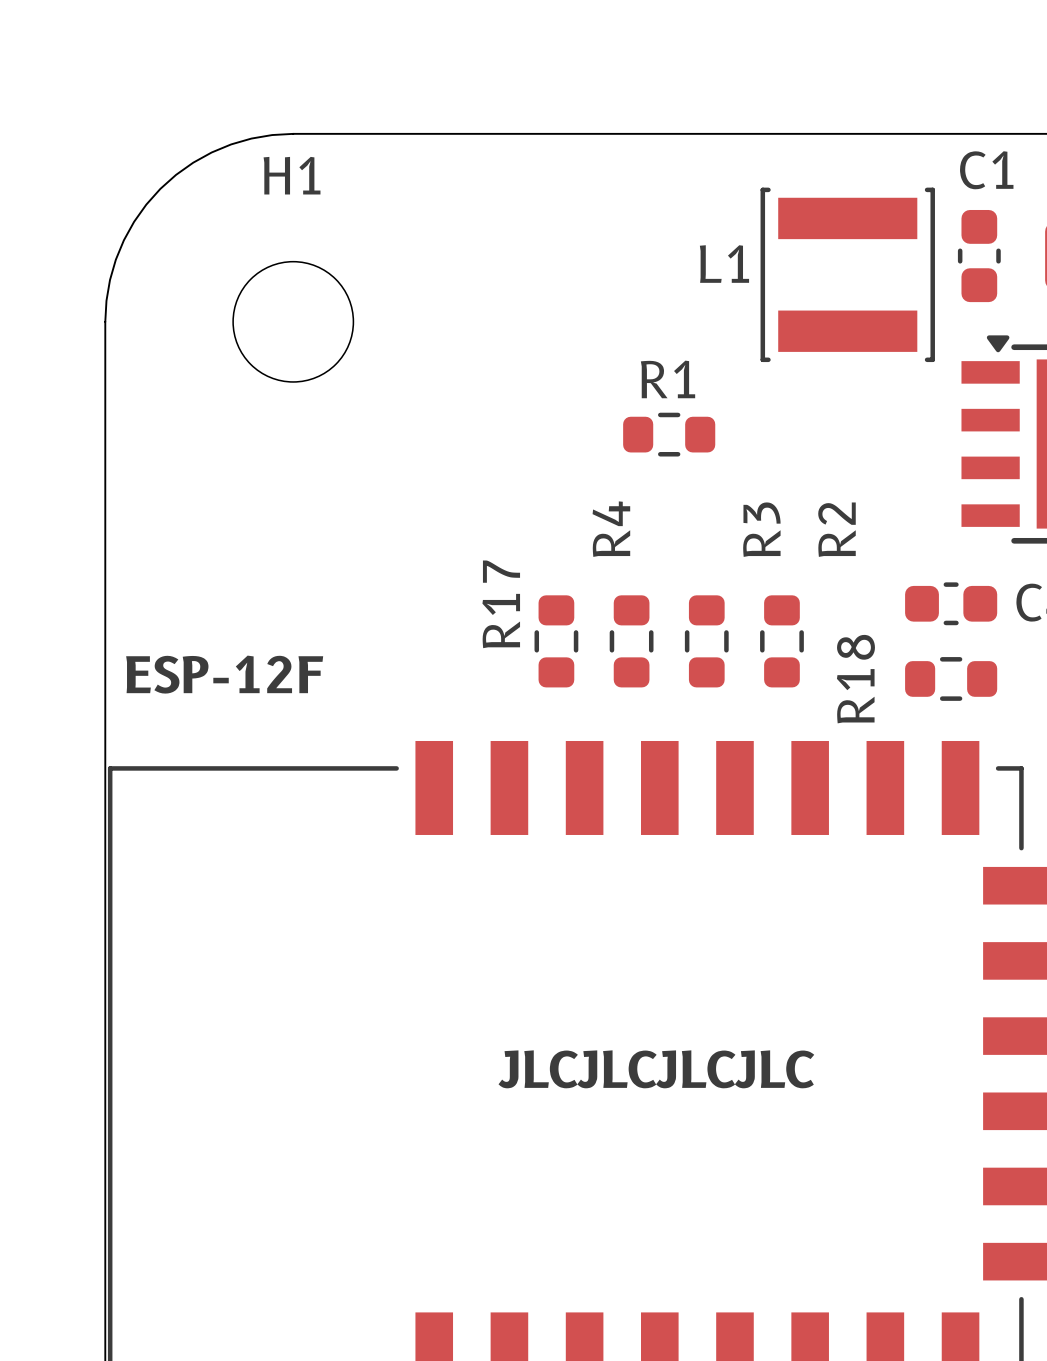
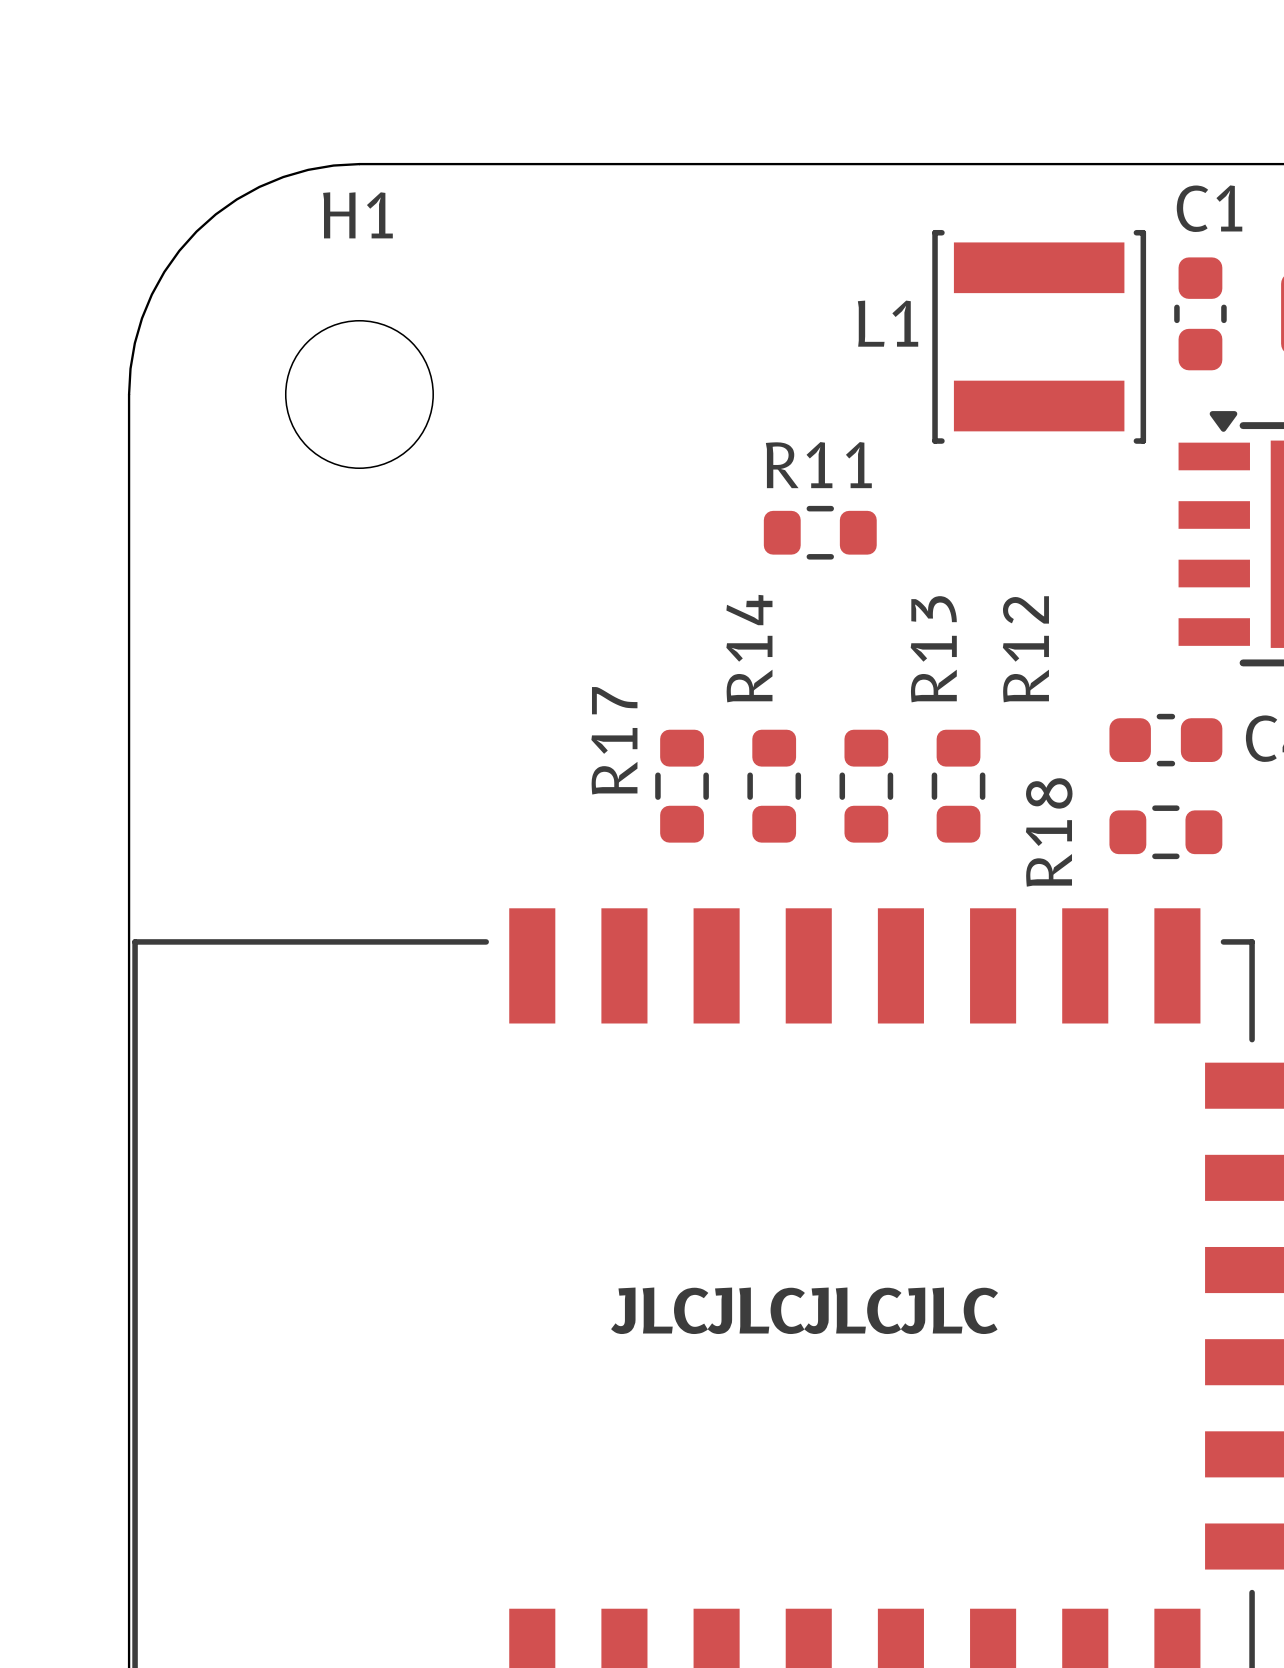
R1 name: R1 (668, 379) -> R11 (818, 465)
R4 name: R4 (611, 529) -> R14 (749, 648)
R3 name: R3 (761, 529) -> R13 (933, 649)
R2 name: R2 (836, 529) -> R12 (1025, 649)
text: ESP-12F (224, 674) -> none

